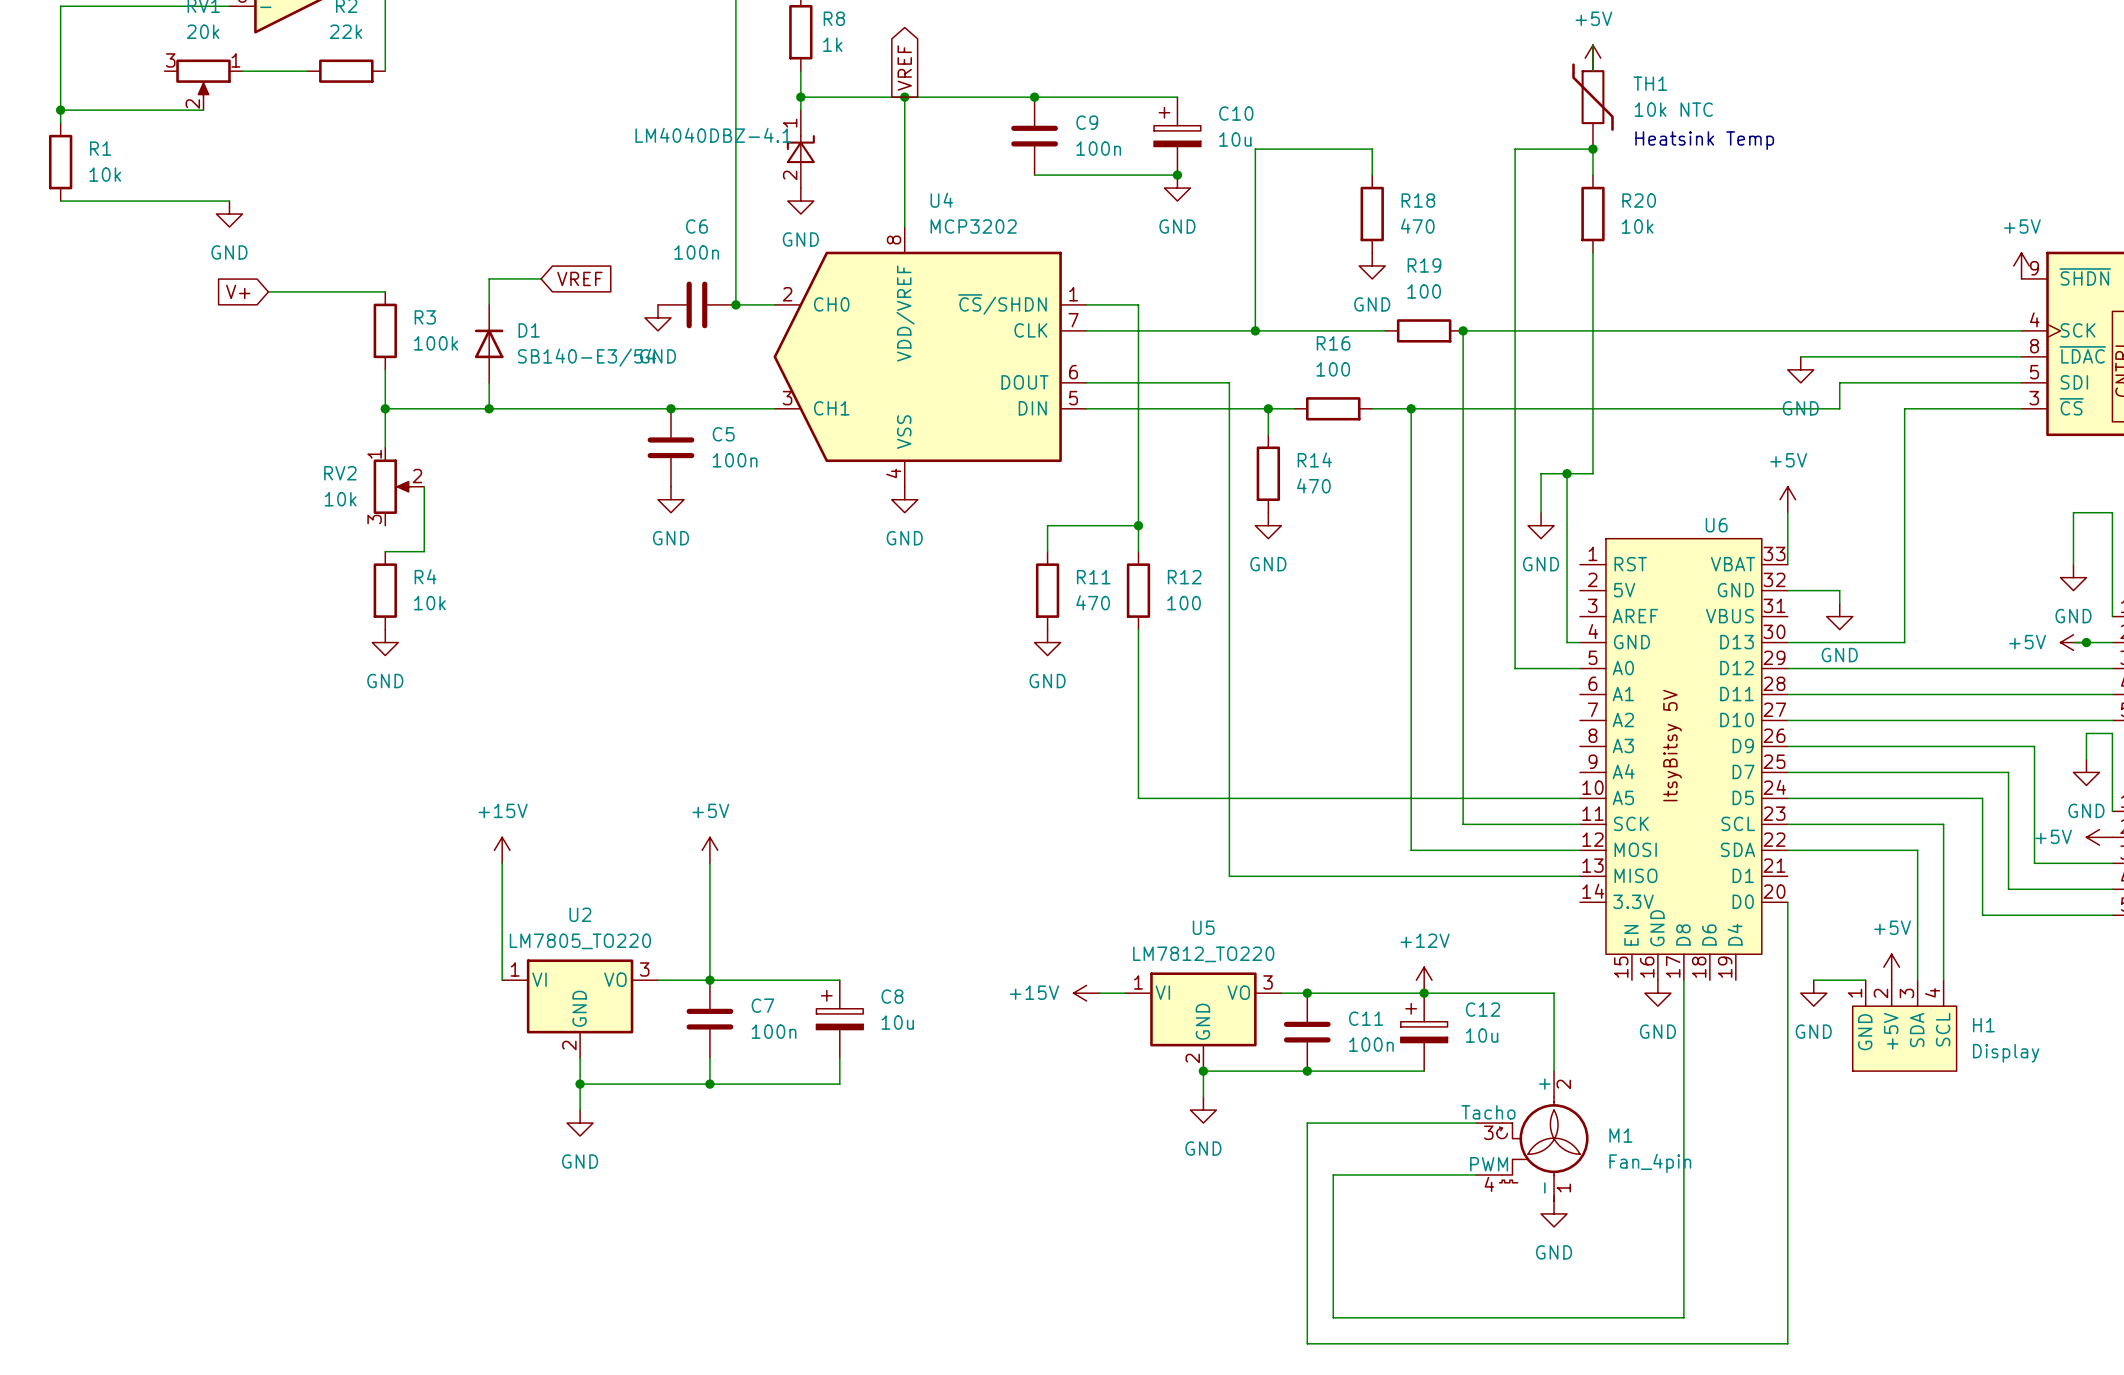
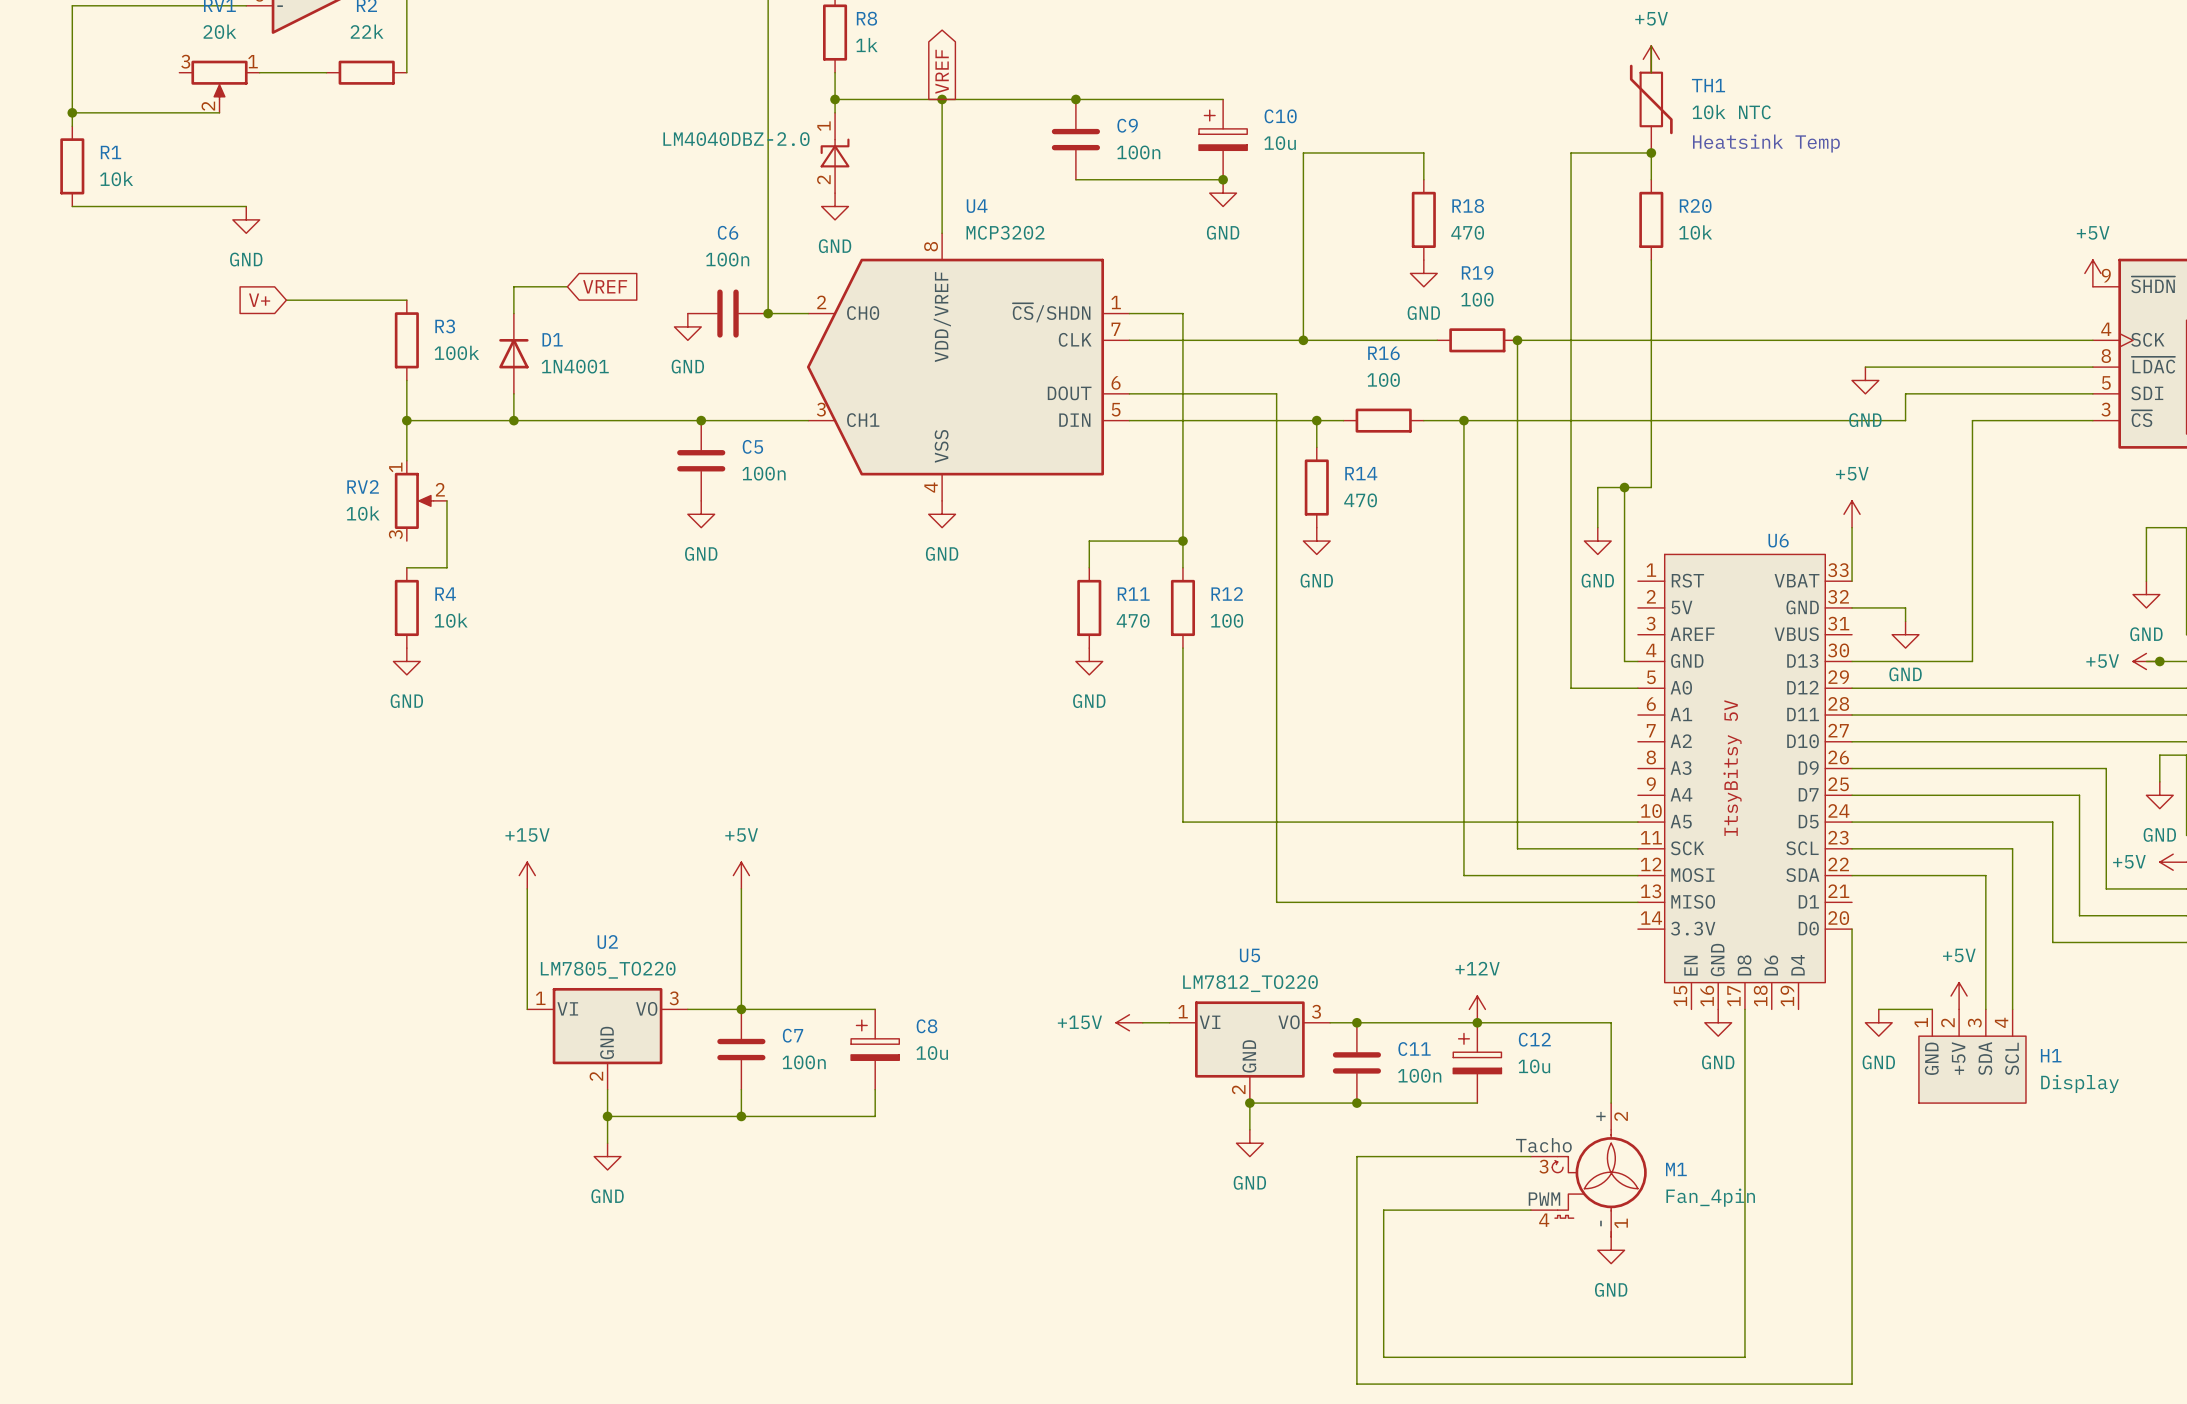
part value: LM4040DBZ-4.1 (713, 135) -> LM4040DBZ-2.0 (736, 139)
D1 value: SB140-E3/54 (586, 357) -> 1N4001 (575, 366)

